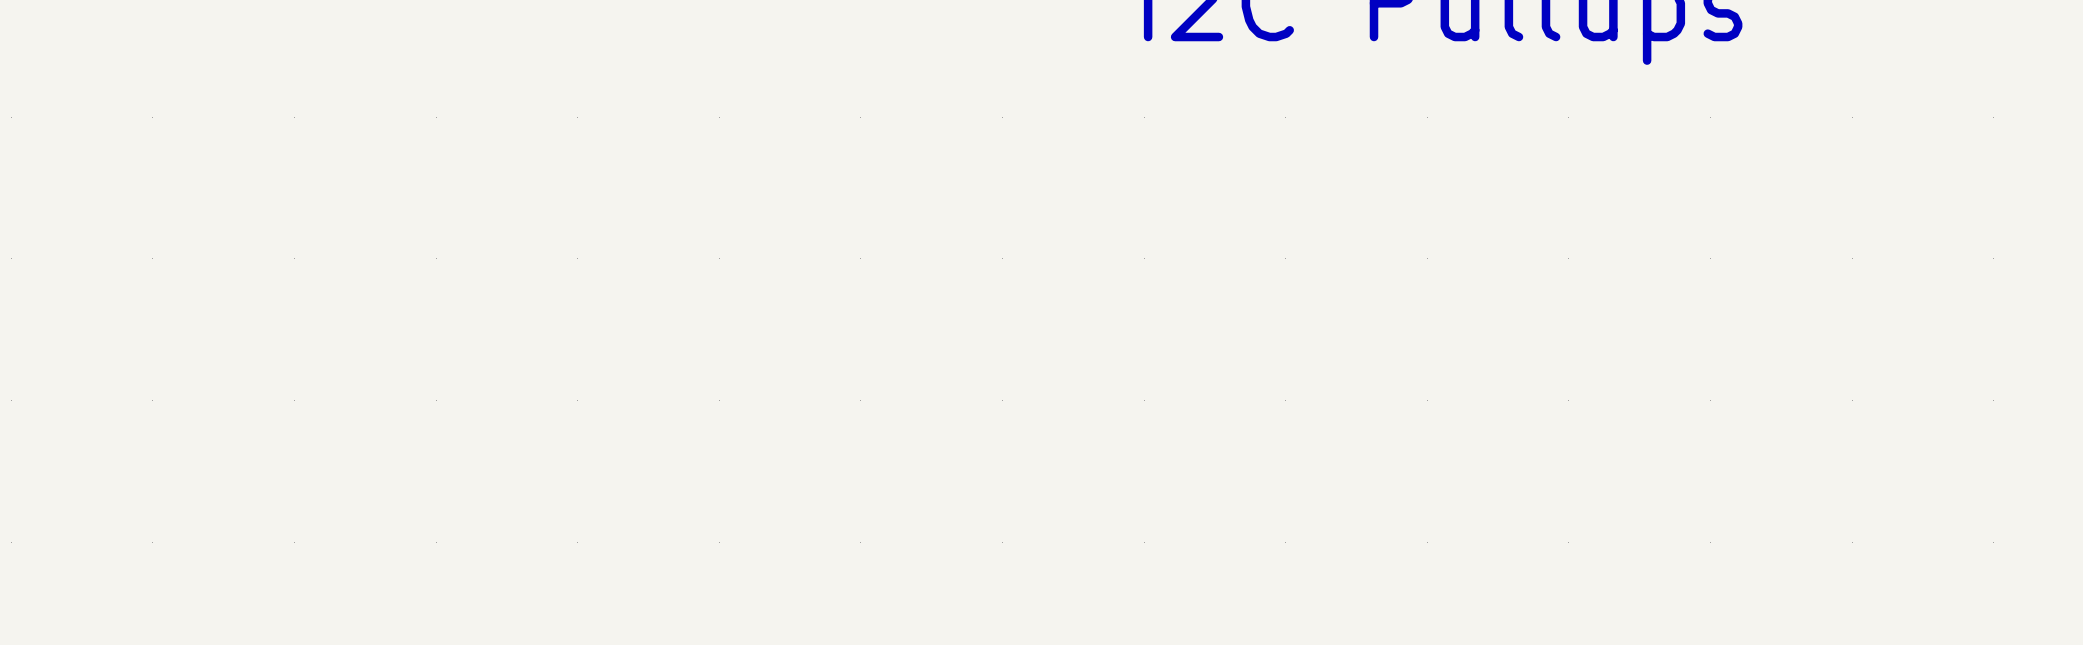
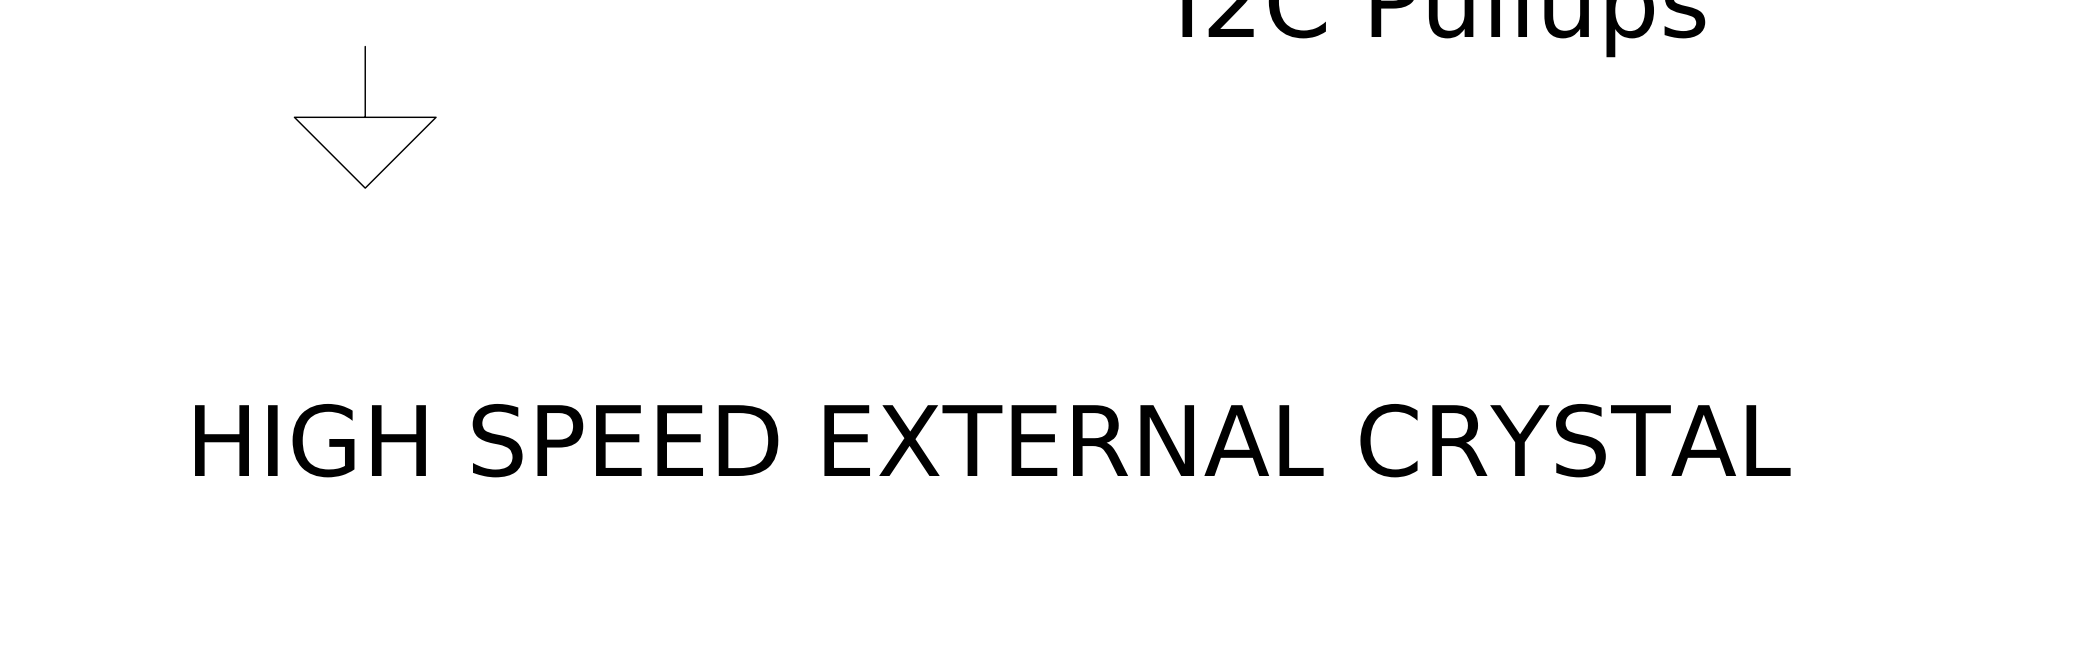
power symbol: none -> (365, 117)
text: none -> HIGH SPEED EXTERNAL CRYSTAL (992, 440)

